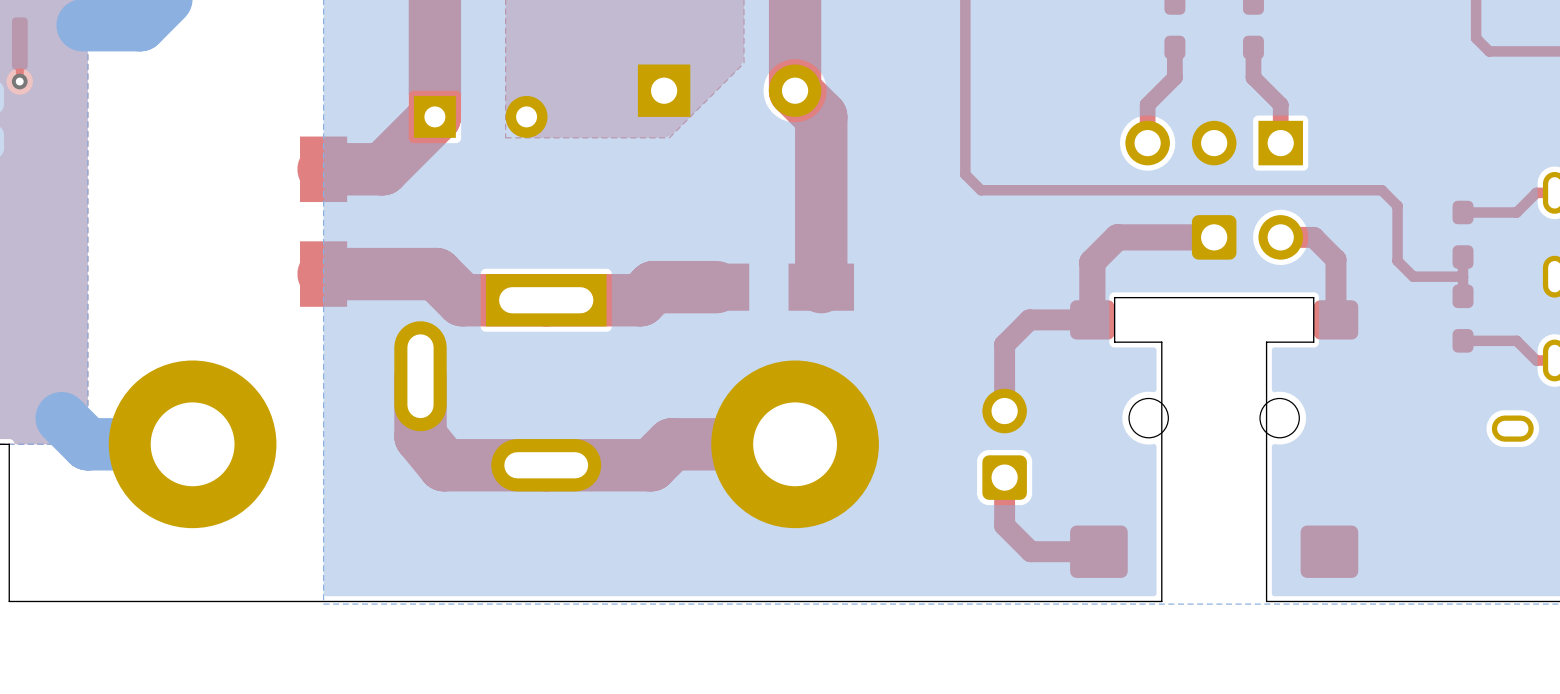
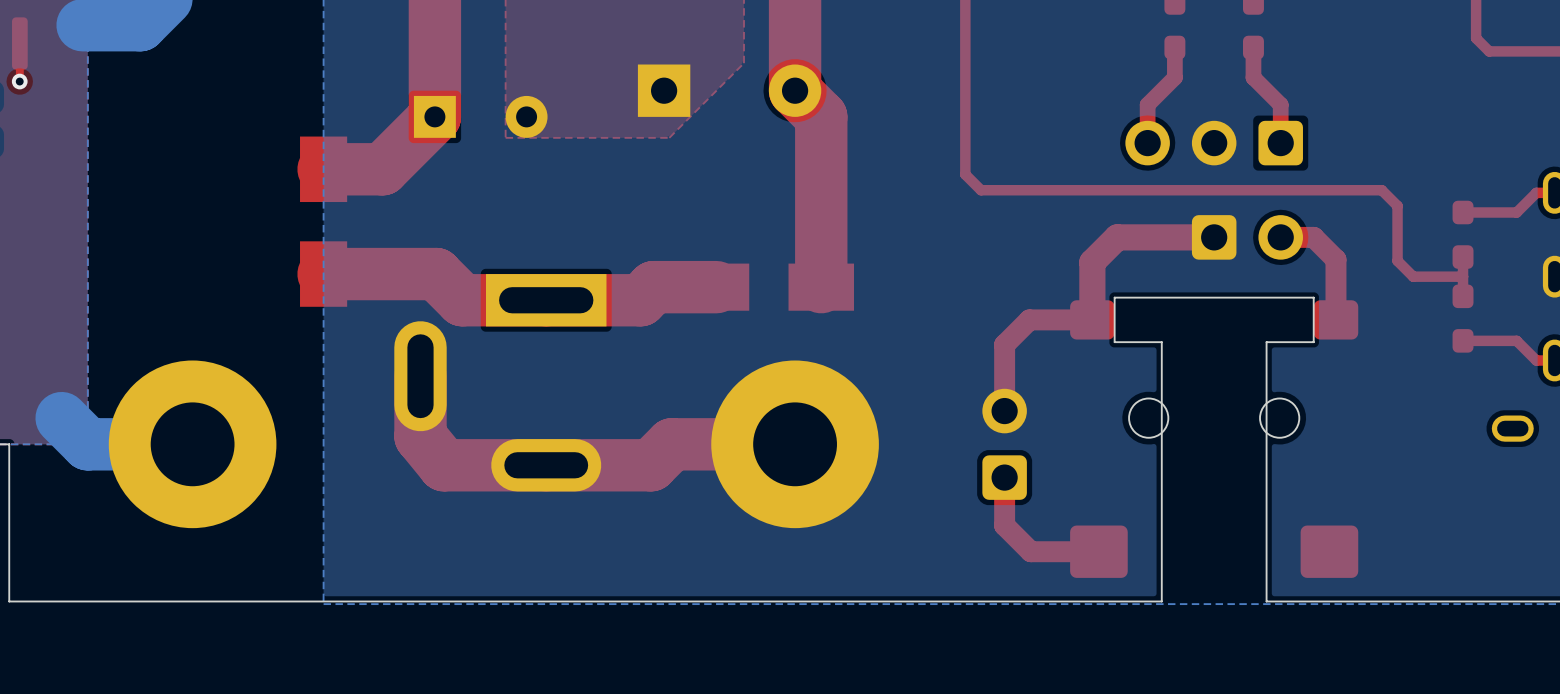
part footprint: [1125, 120, 1303, 166] -> [1125, 120, 1303, 166]

